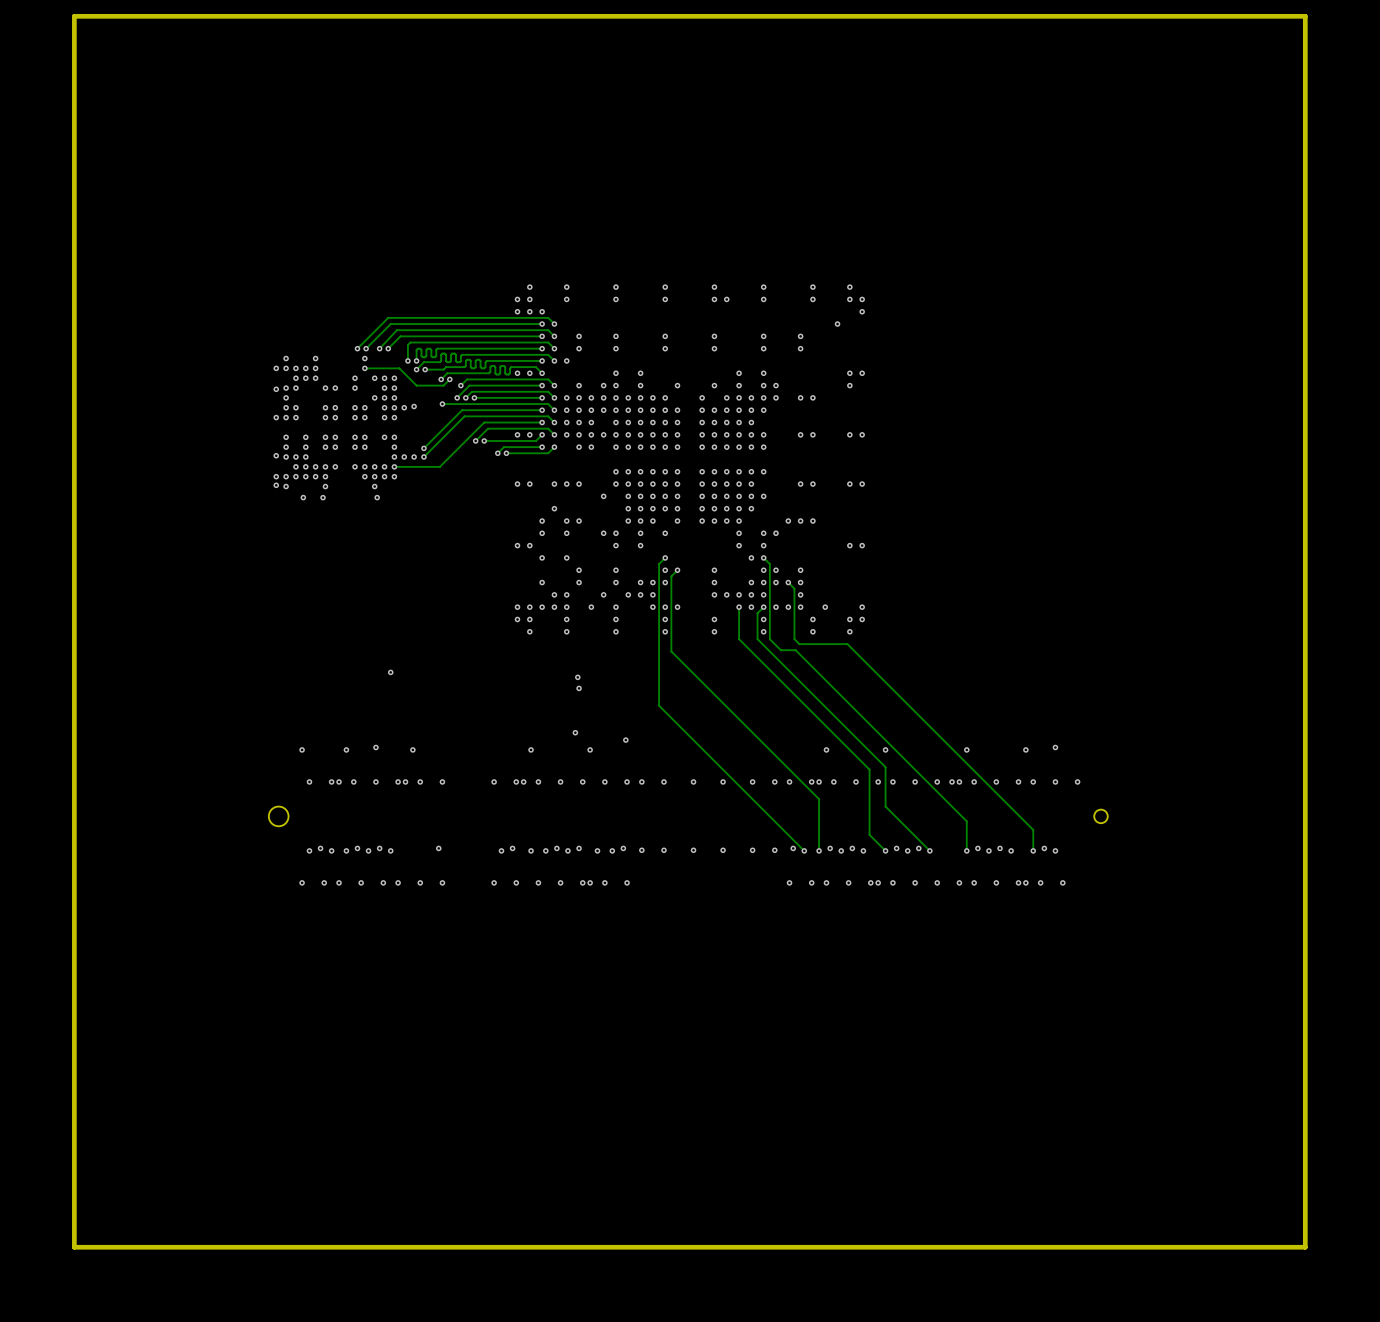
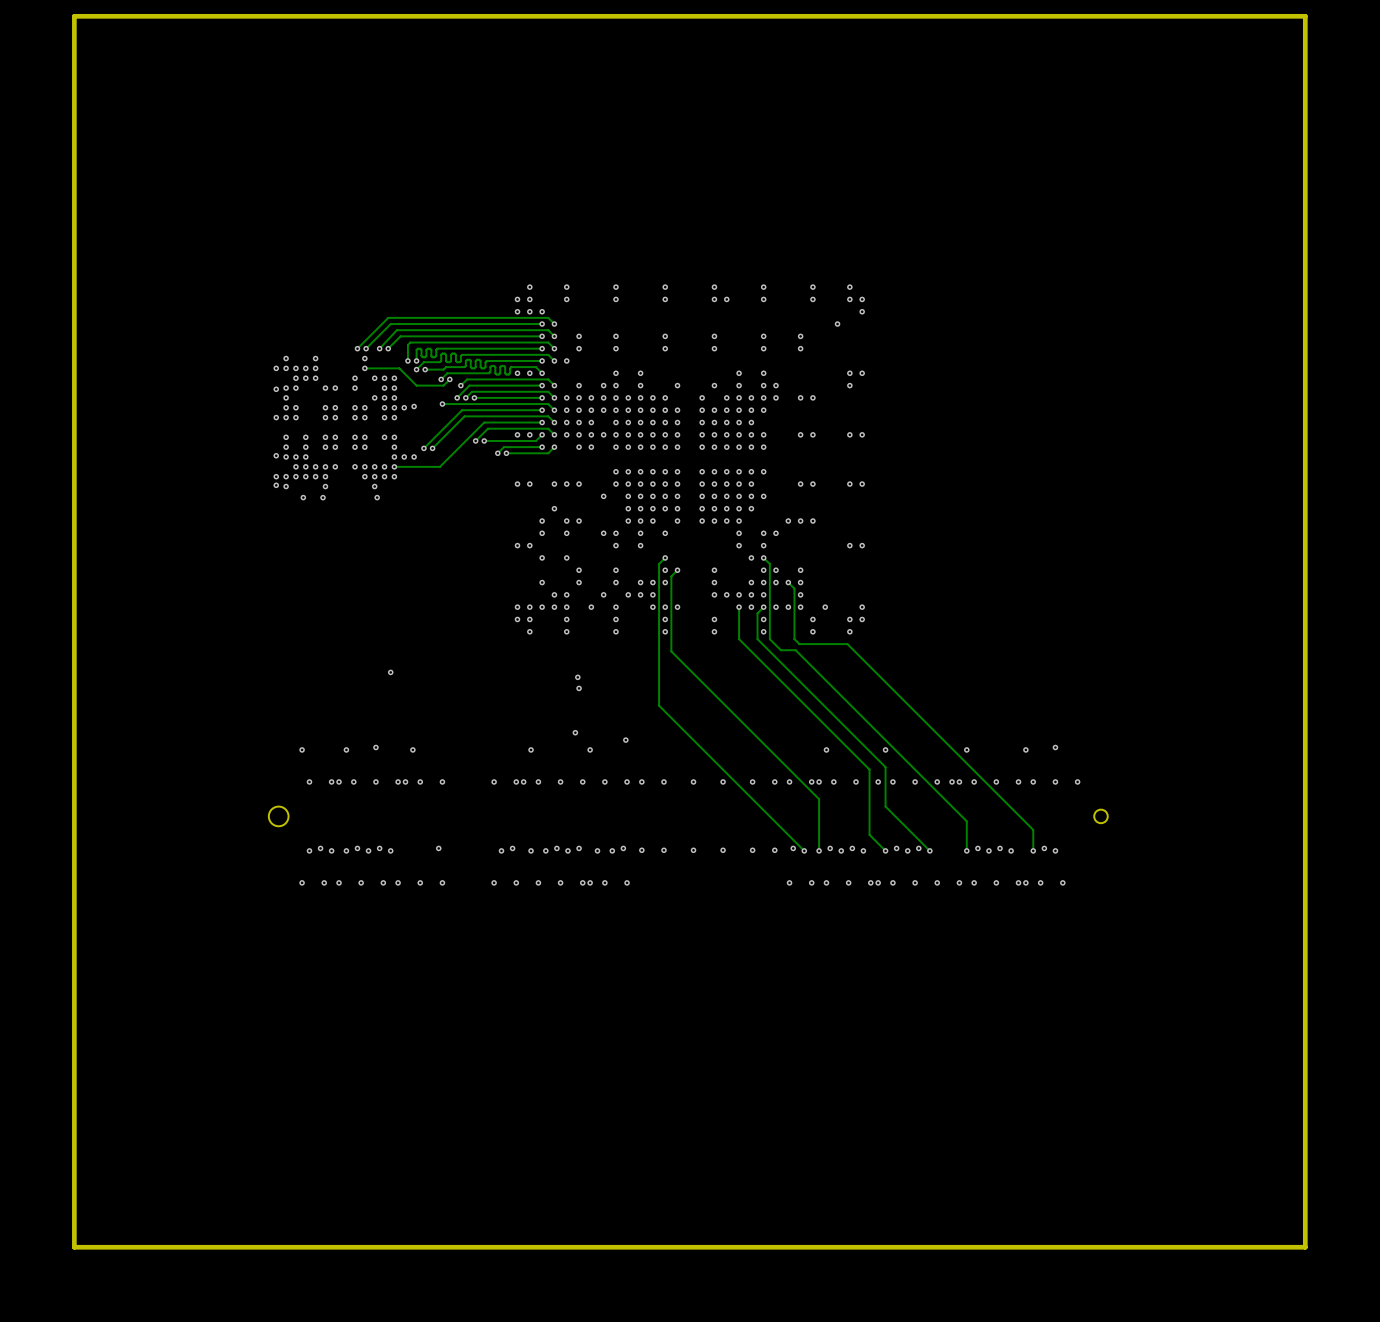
track: (464, 416) (423, 456) -> (464, 416) (432, 448)
via position: (423, 456) -> (432, 448)

